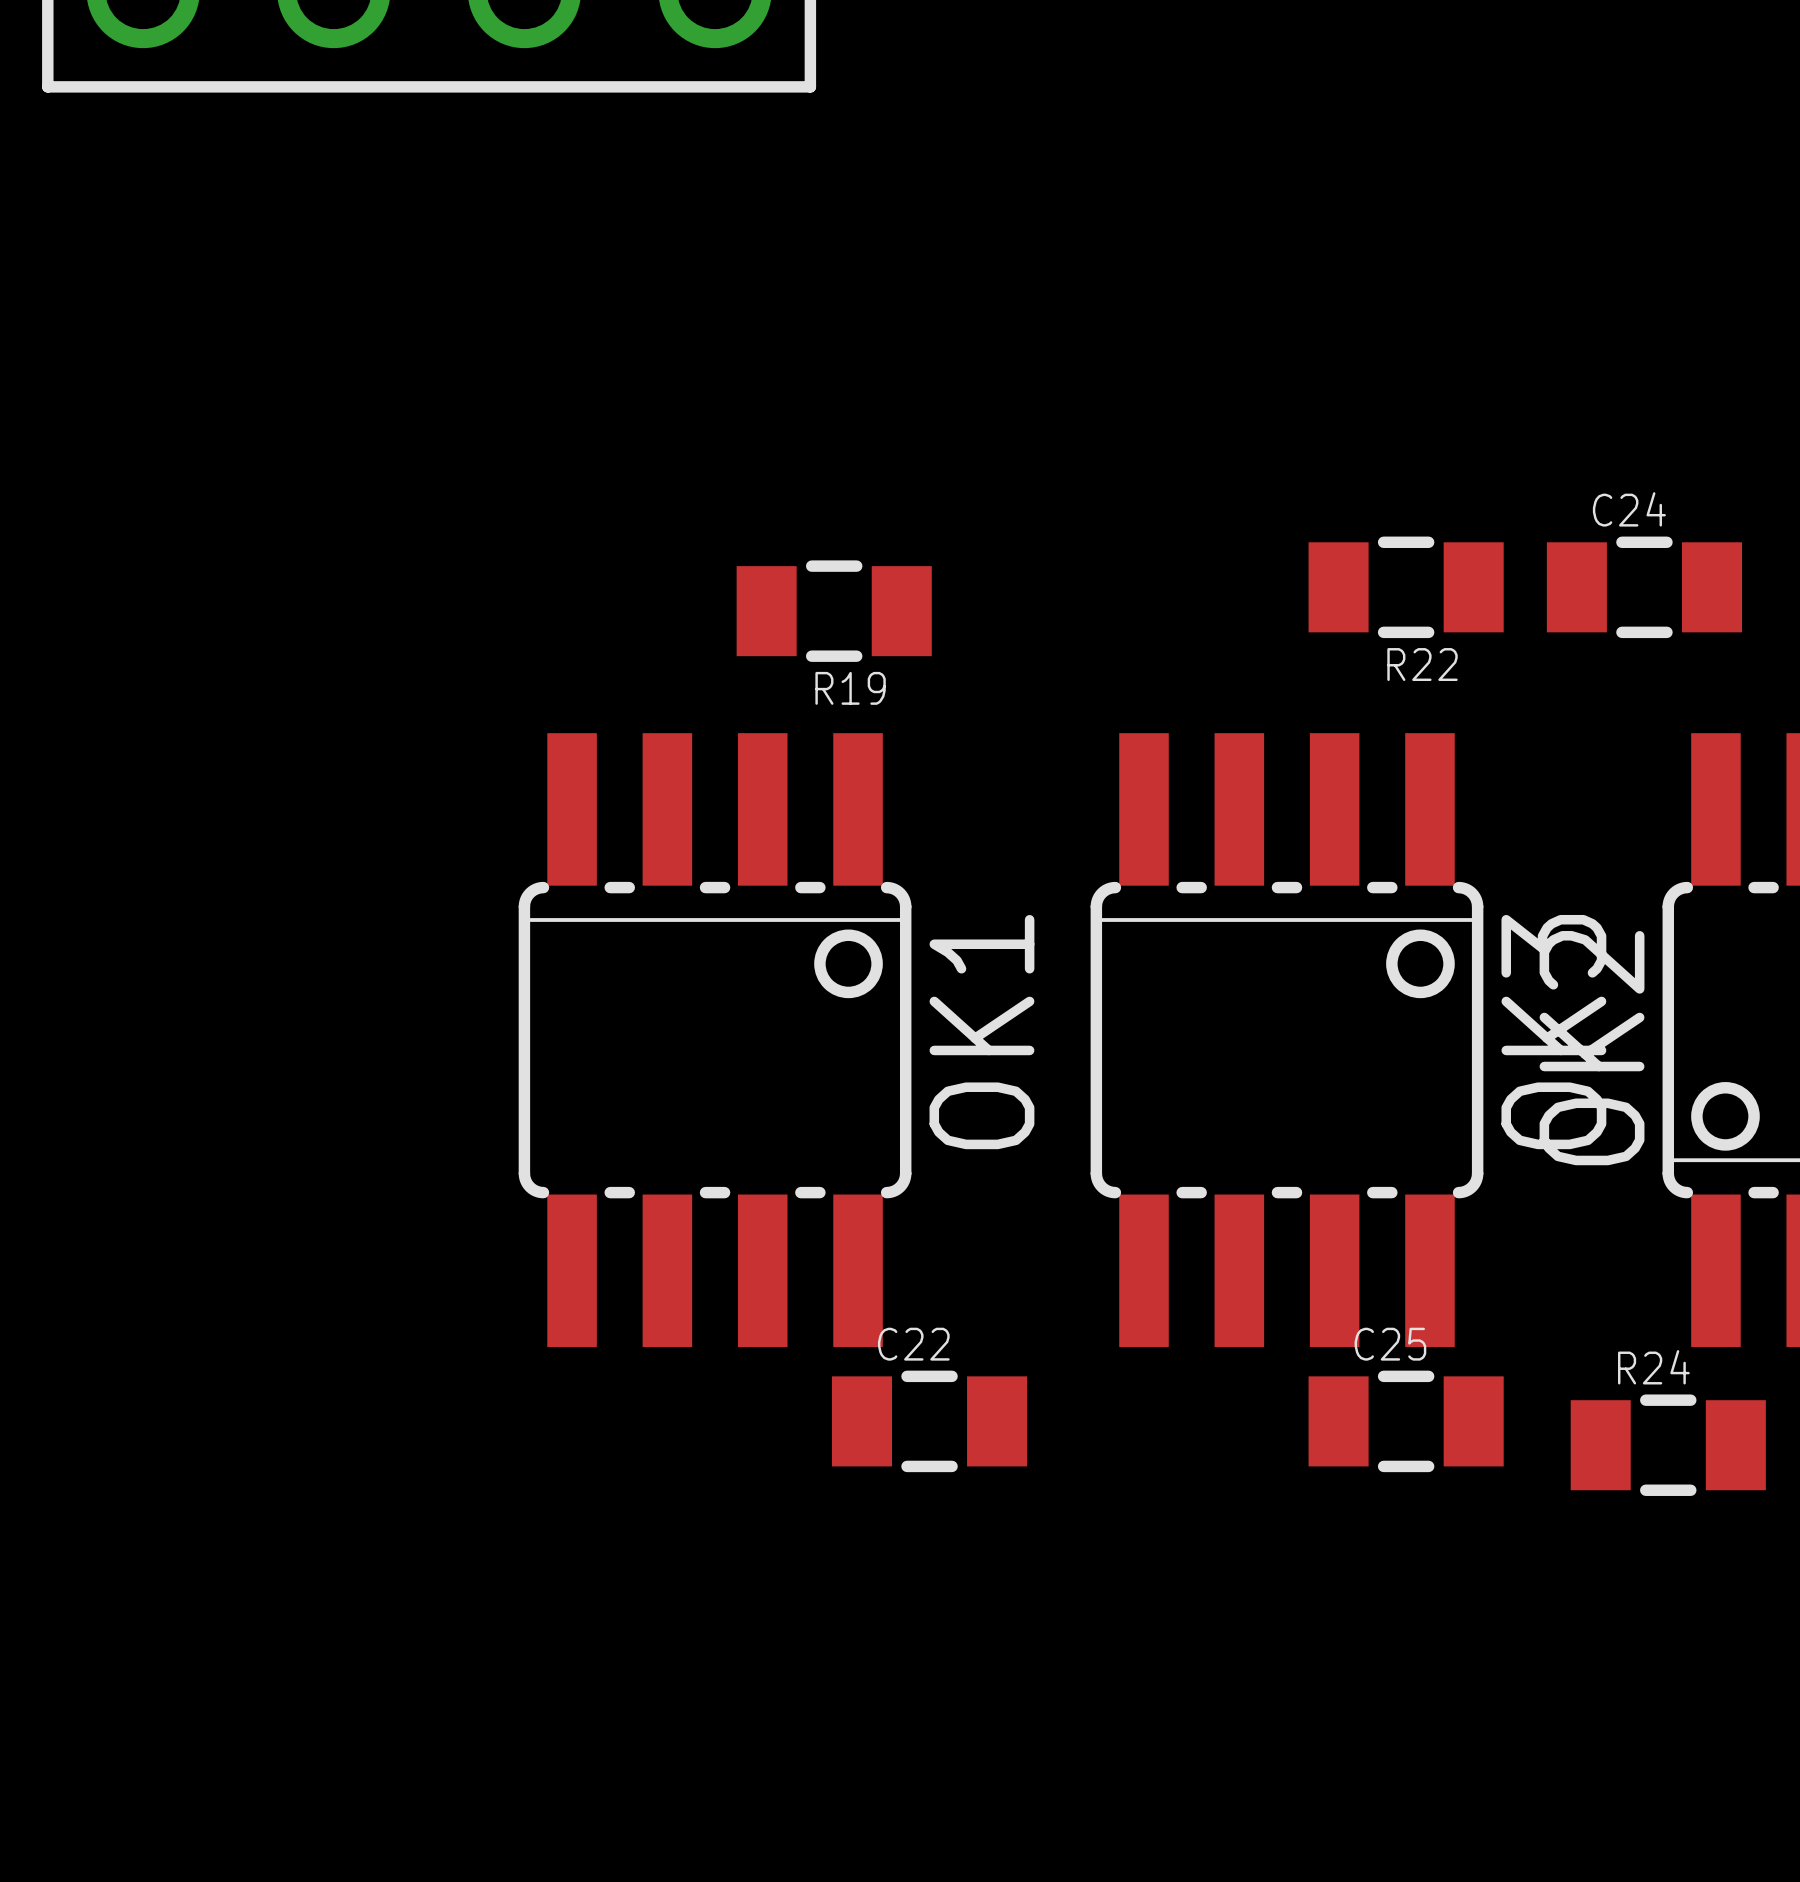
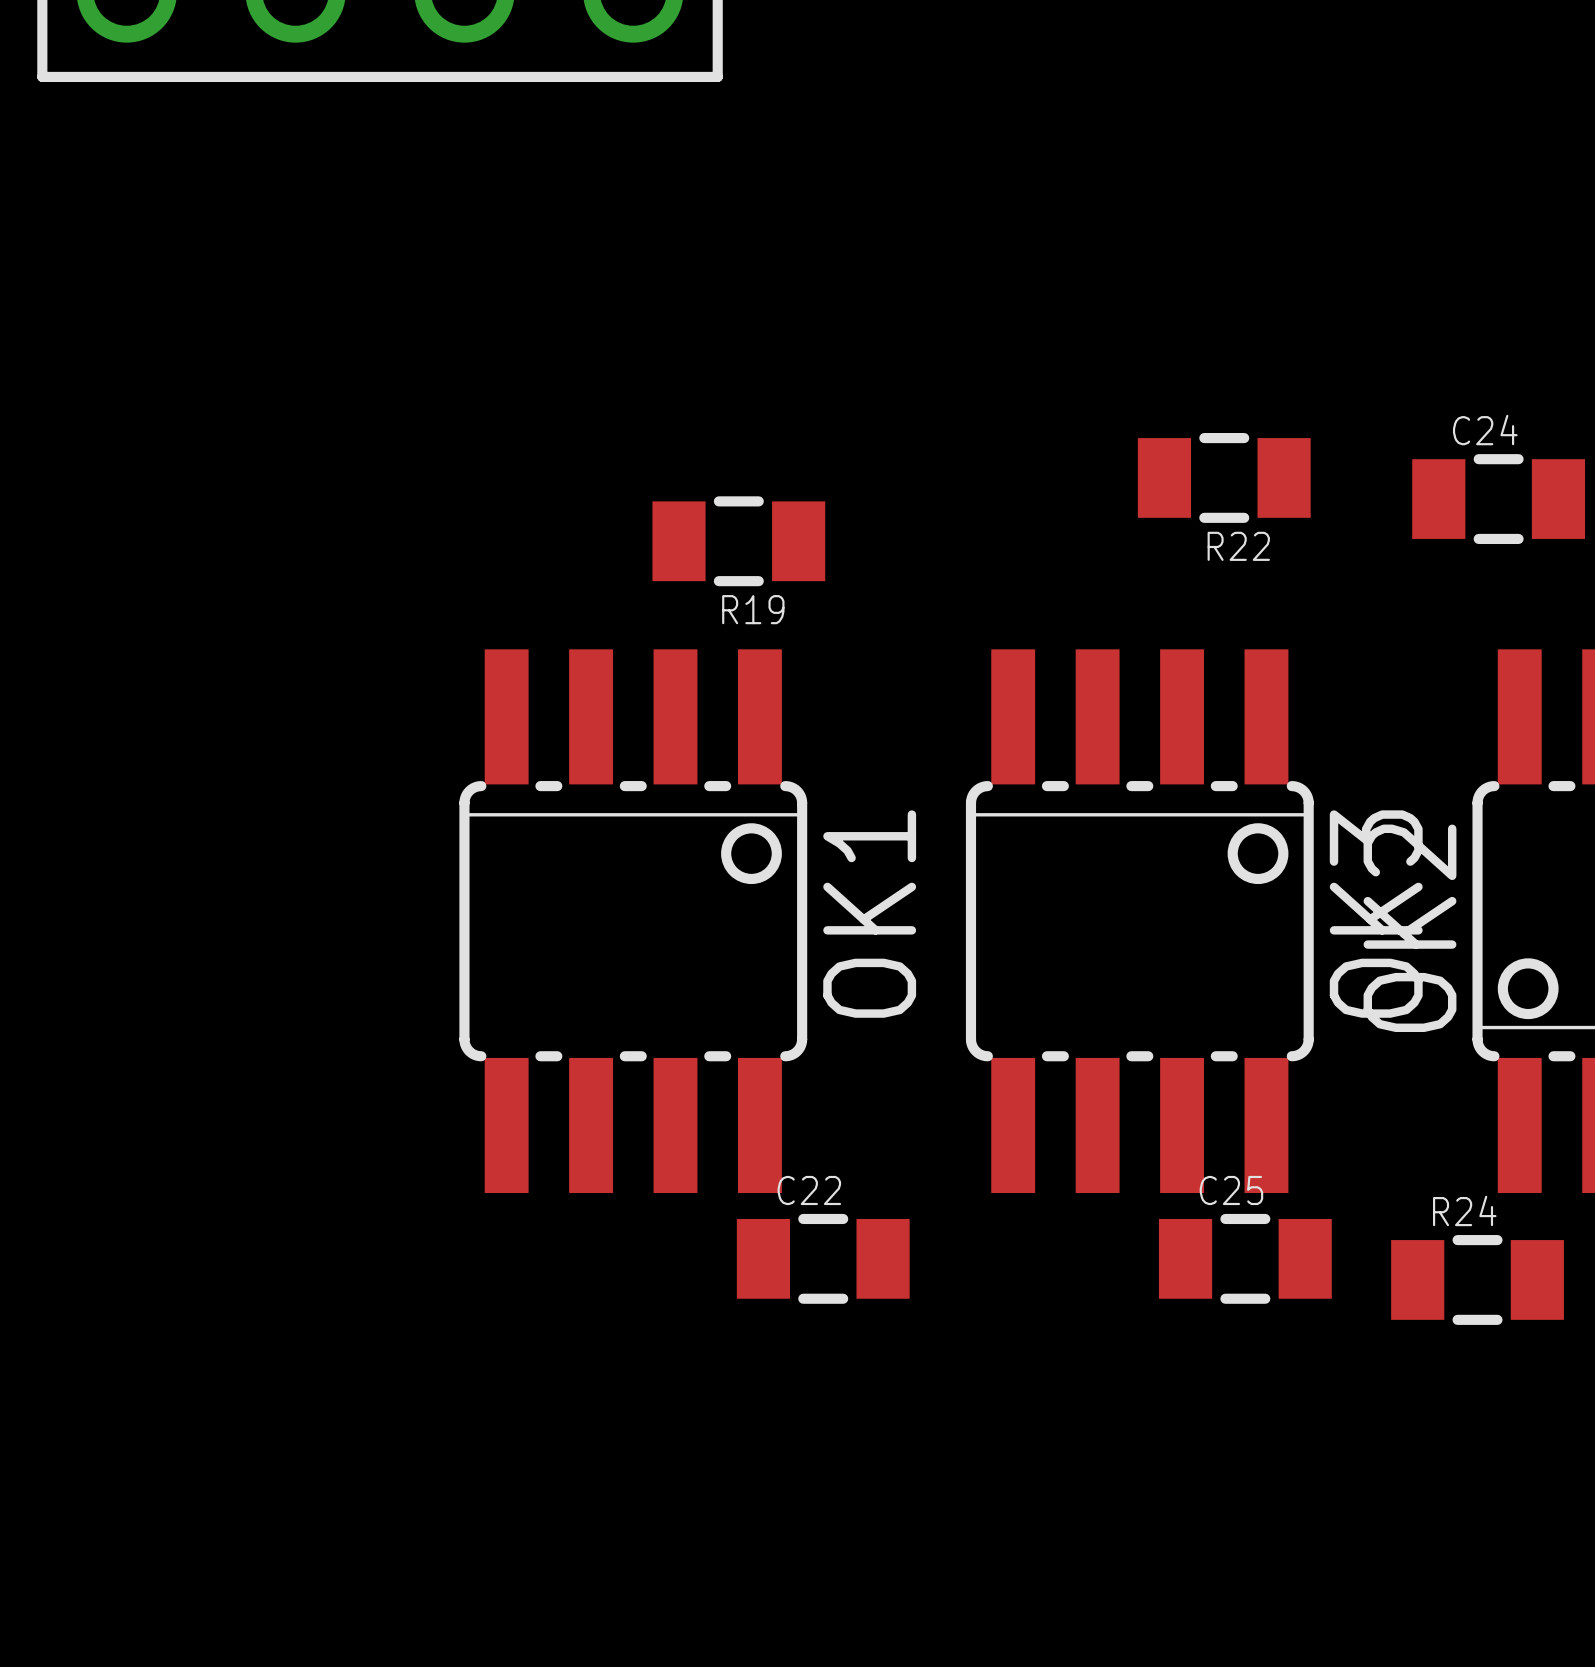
R22 position: (1406, 587) -> (1224, 477)
C24 position: (1644, 587) -> (1498, 499)

